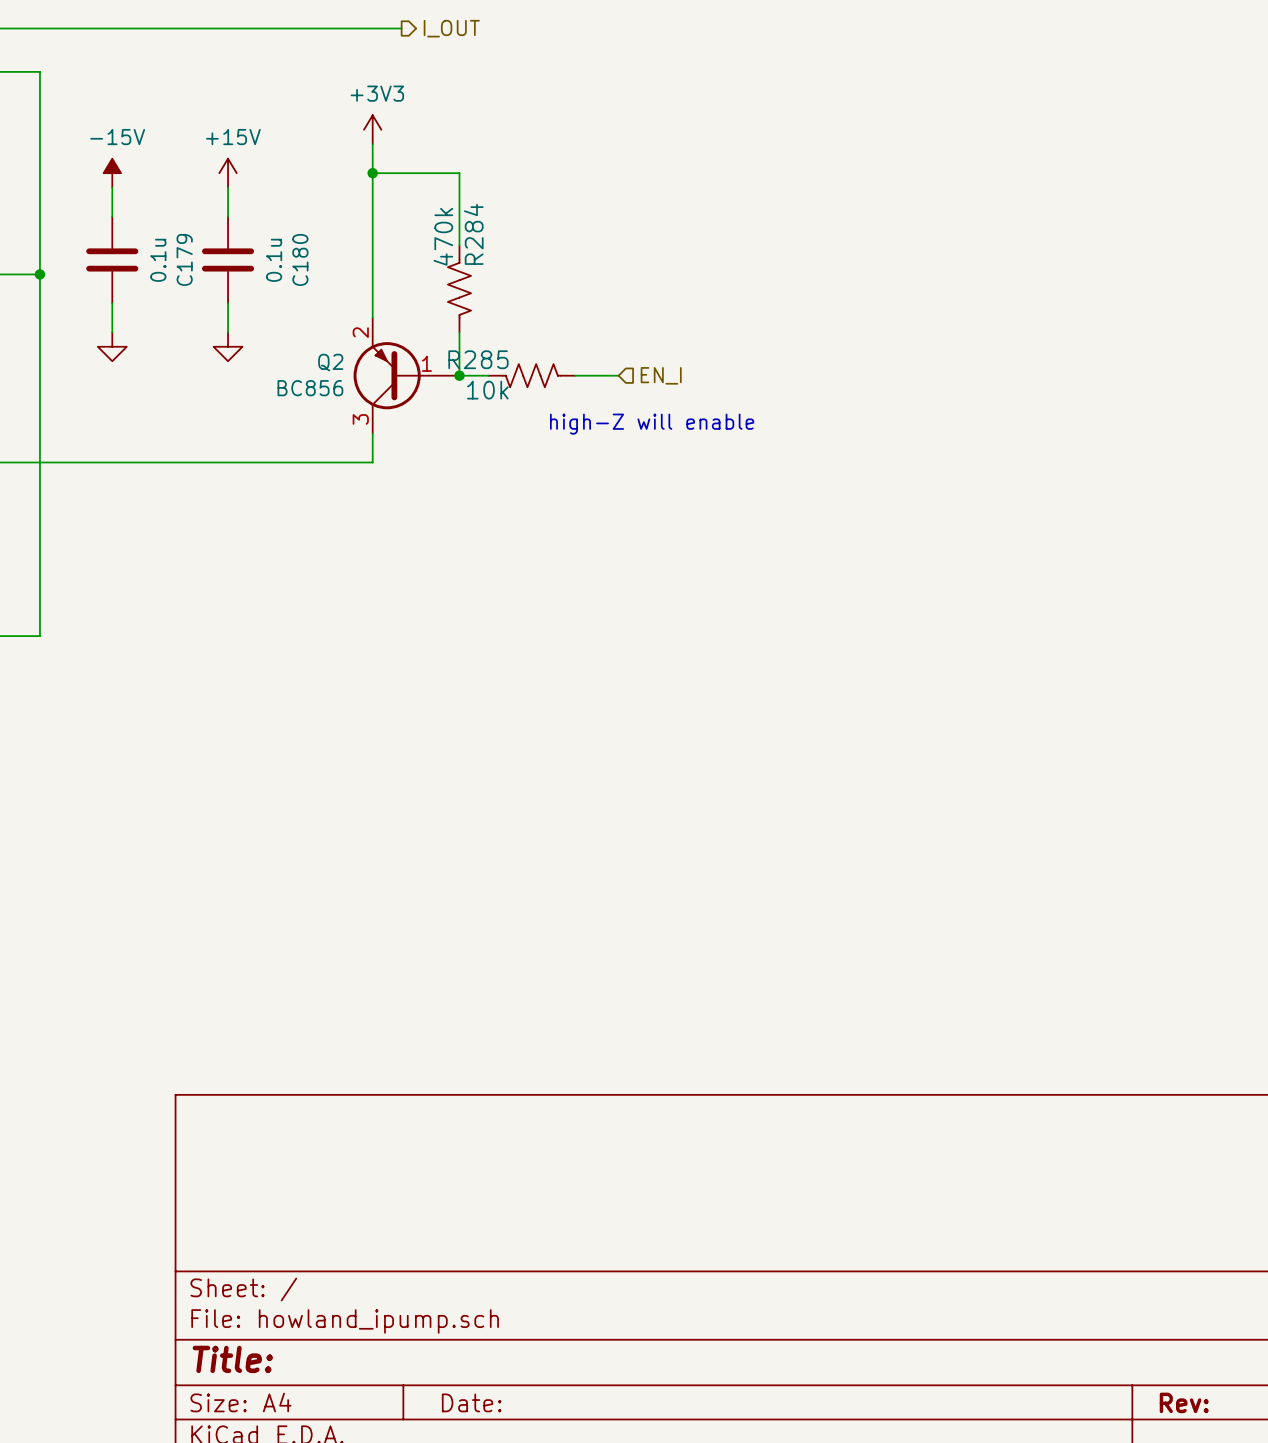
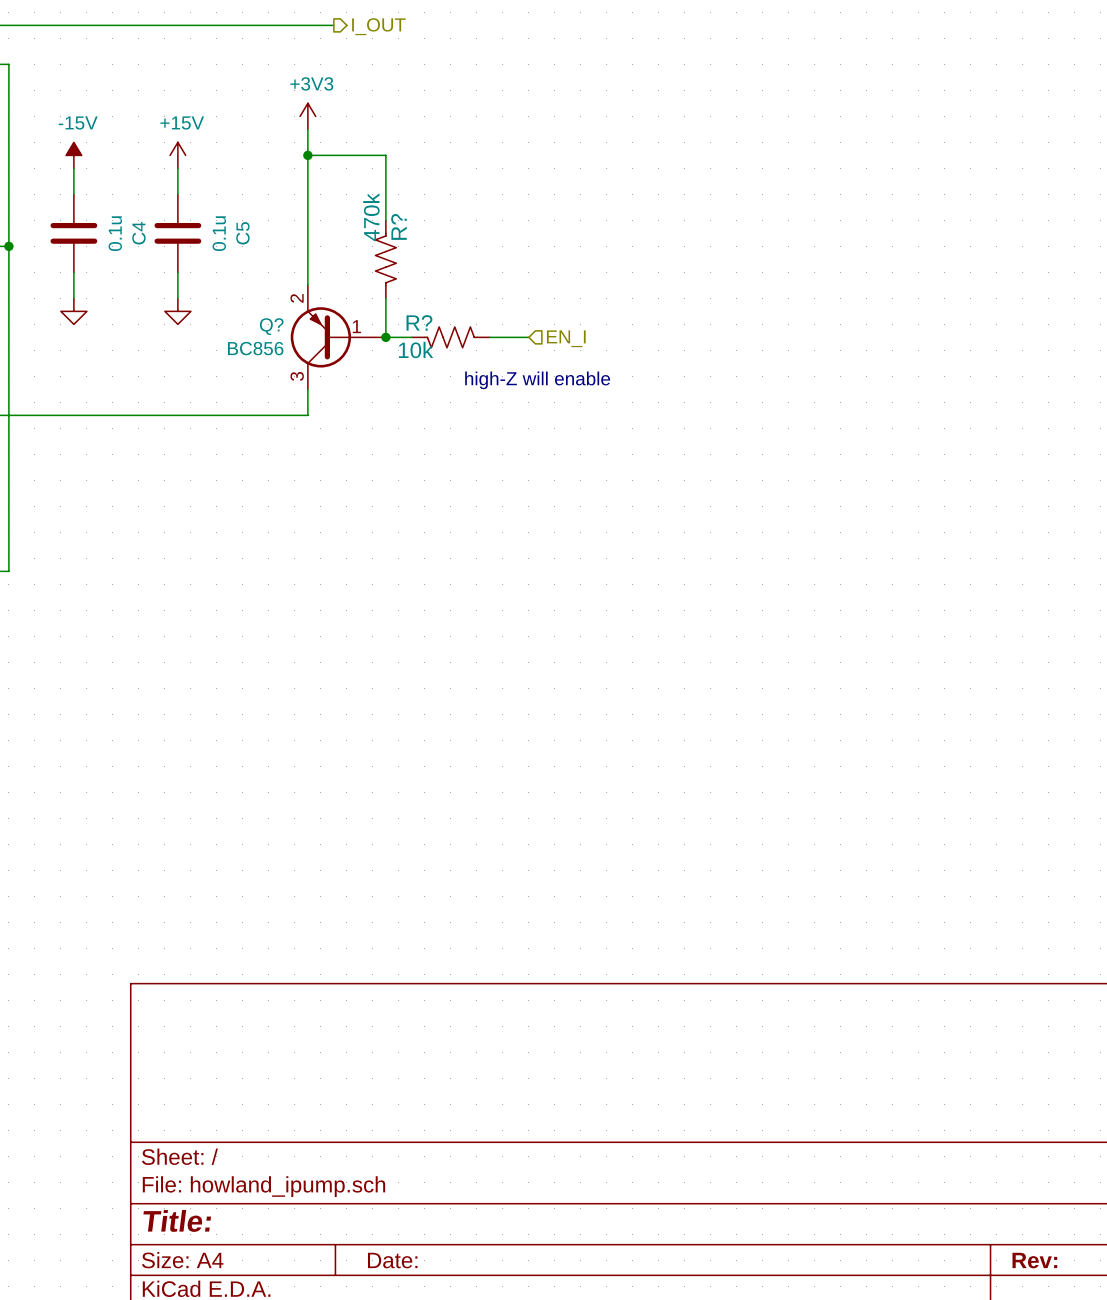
R284 name: R284 (473, 234) -> R? (398, 226)
C179 name: C179 (184, 259) -> C4 (138, 233)
C180 name: C180 (300, 259) -> C5 (242, 233)
R285 name: R285 (478, 359) -> R? (419, 322)
Q2 name: Q2 (330, 362) -> Q? (271, 326)

